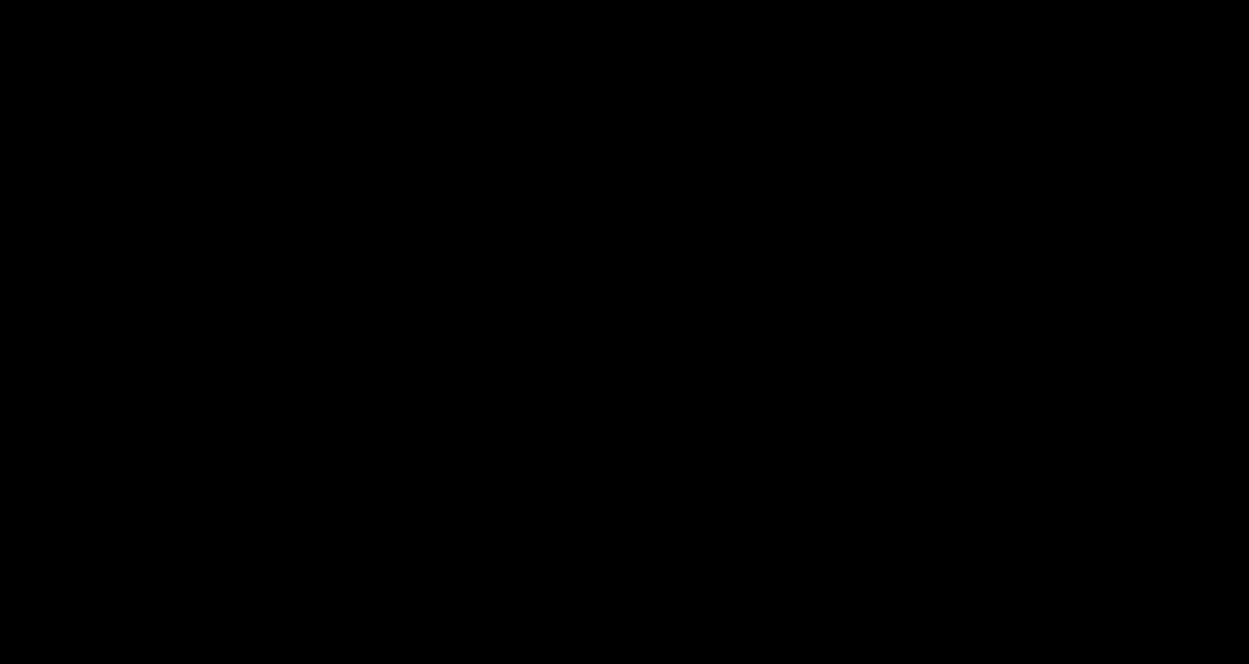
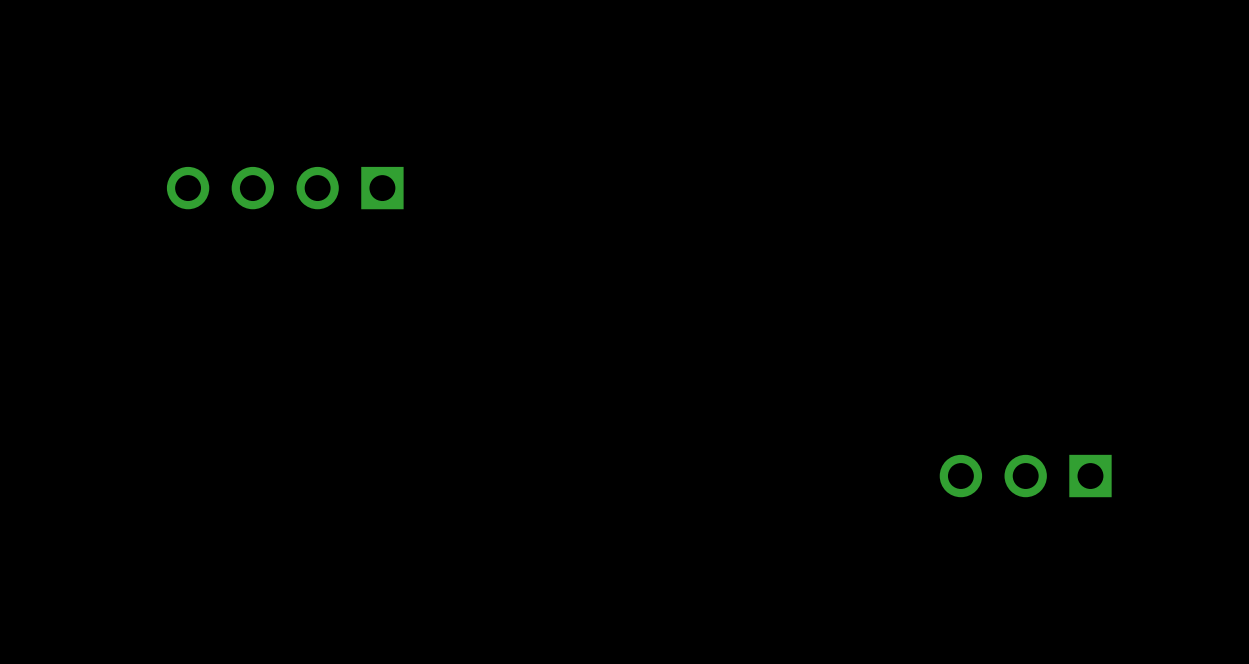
part: none -> (285, 188)
part: none -> (1025, 476)

